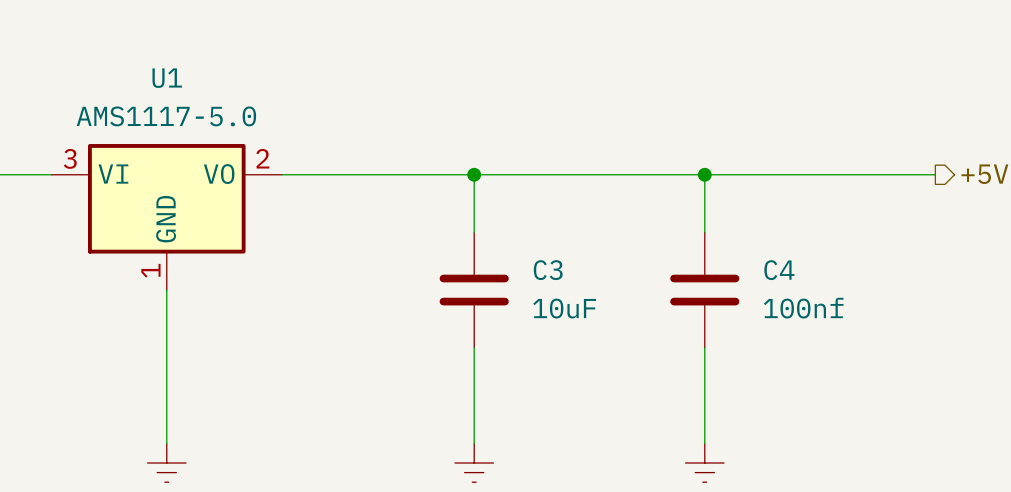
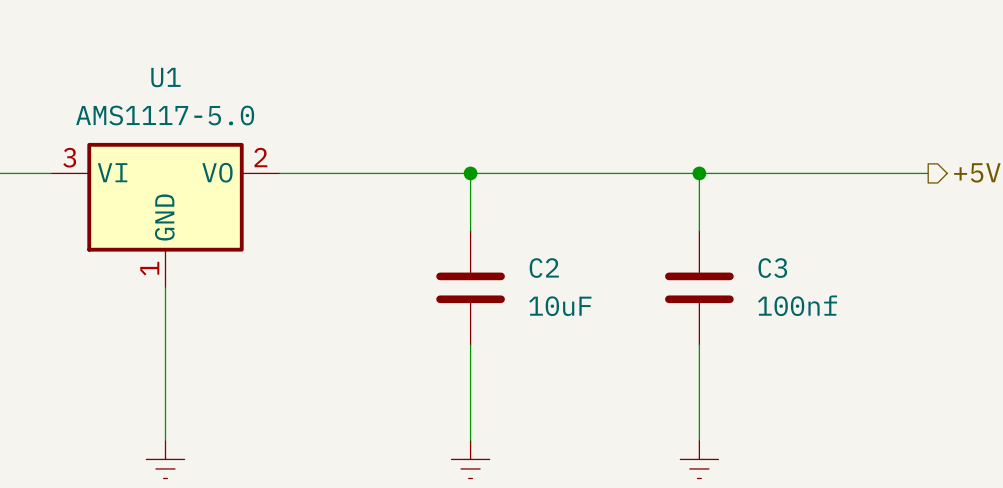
C3 name: C3 (548, 270) -> C2 (544, 268)
C4 name: C4 (779, 270) -> C3 (772, 268)

